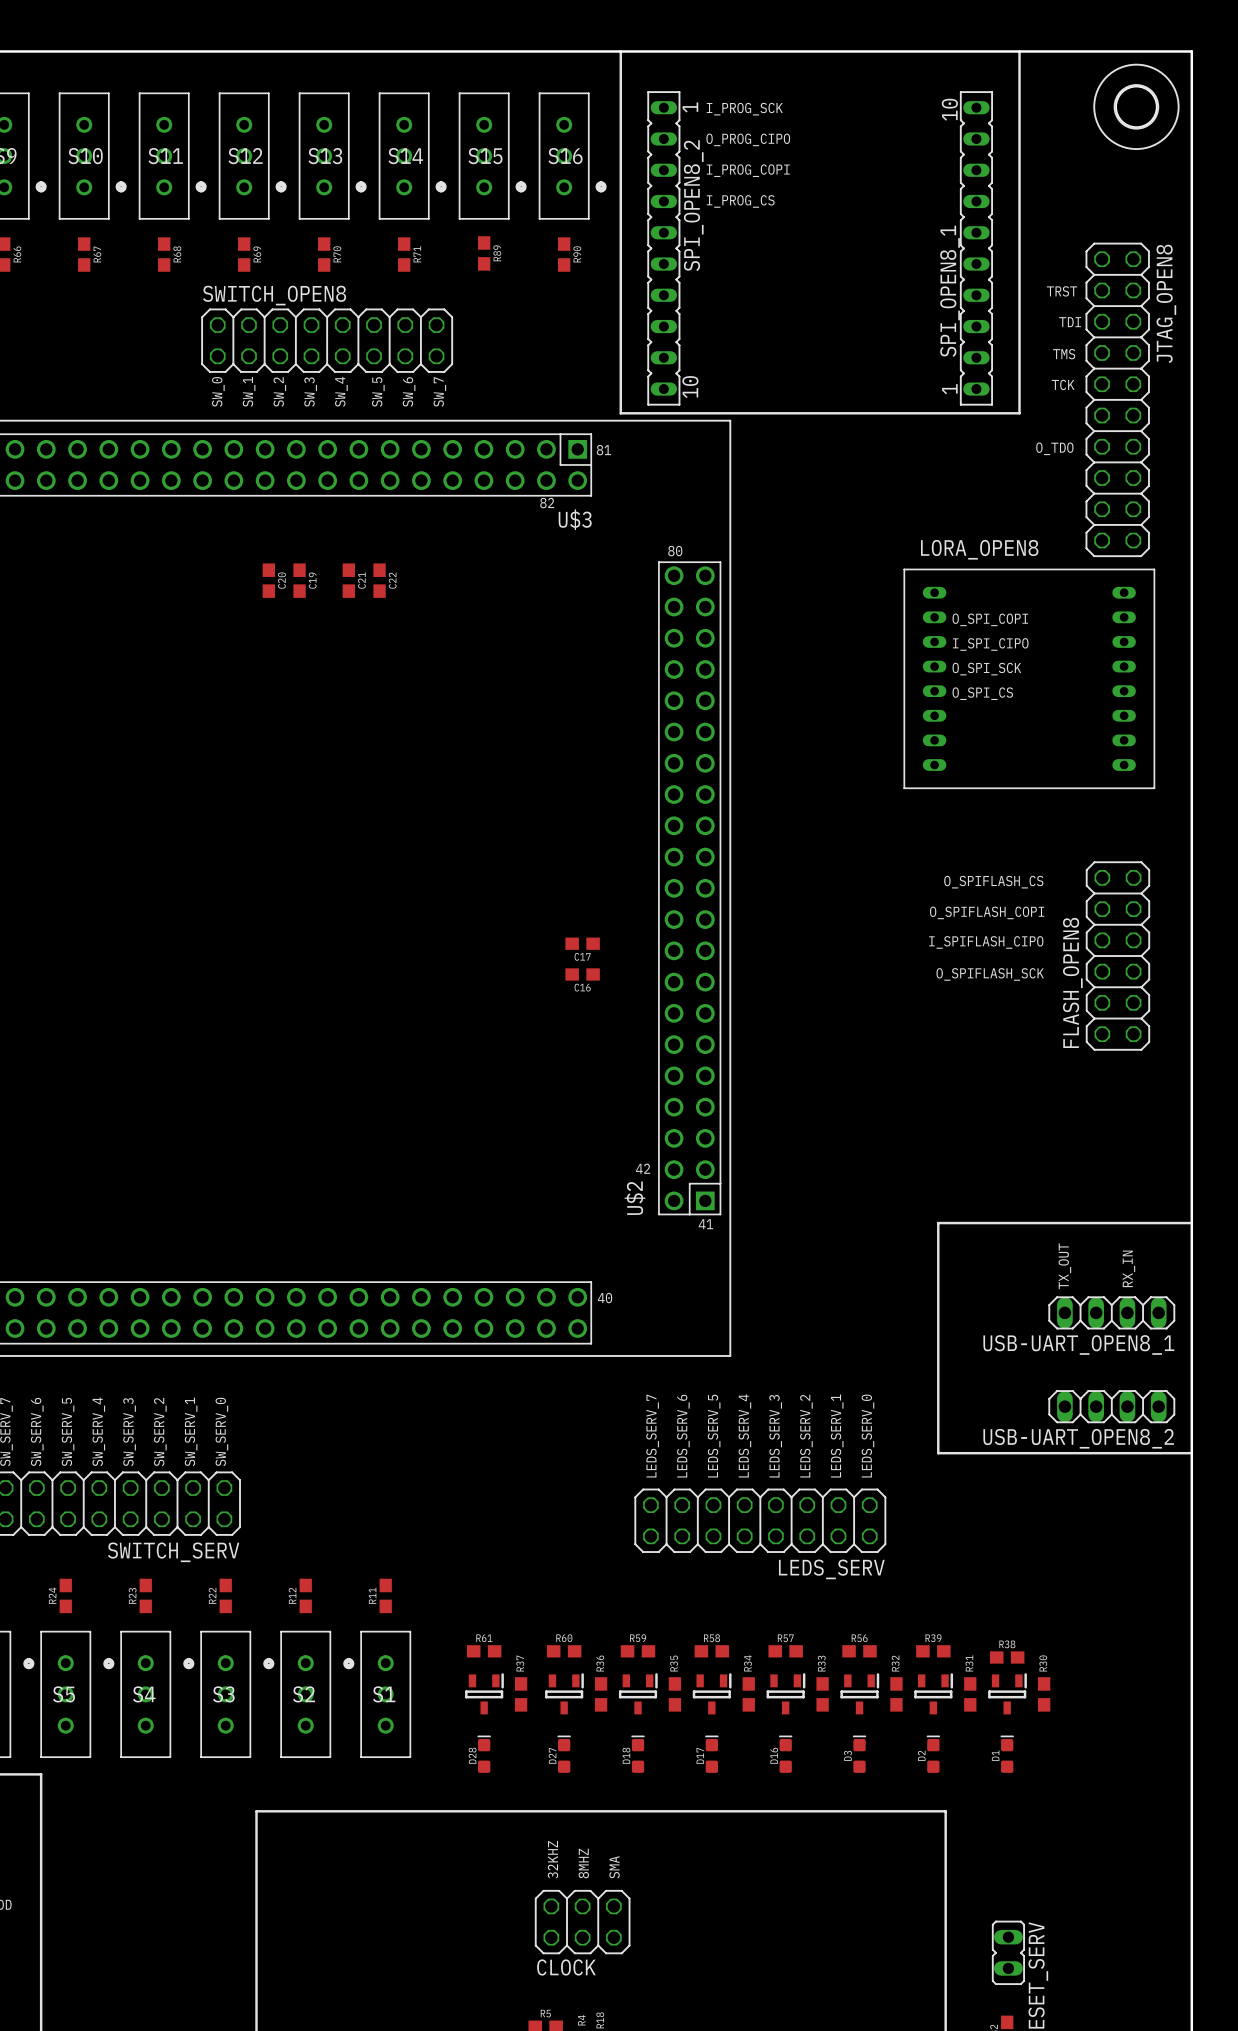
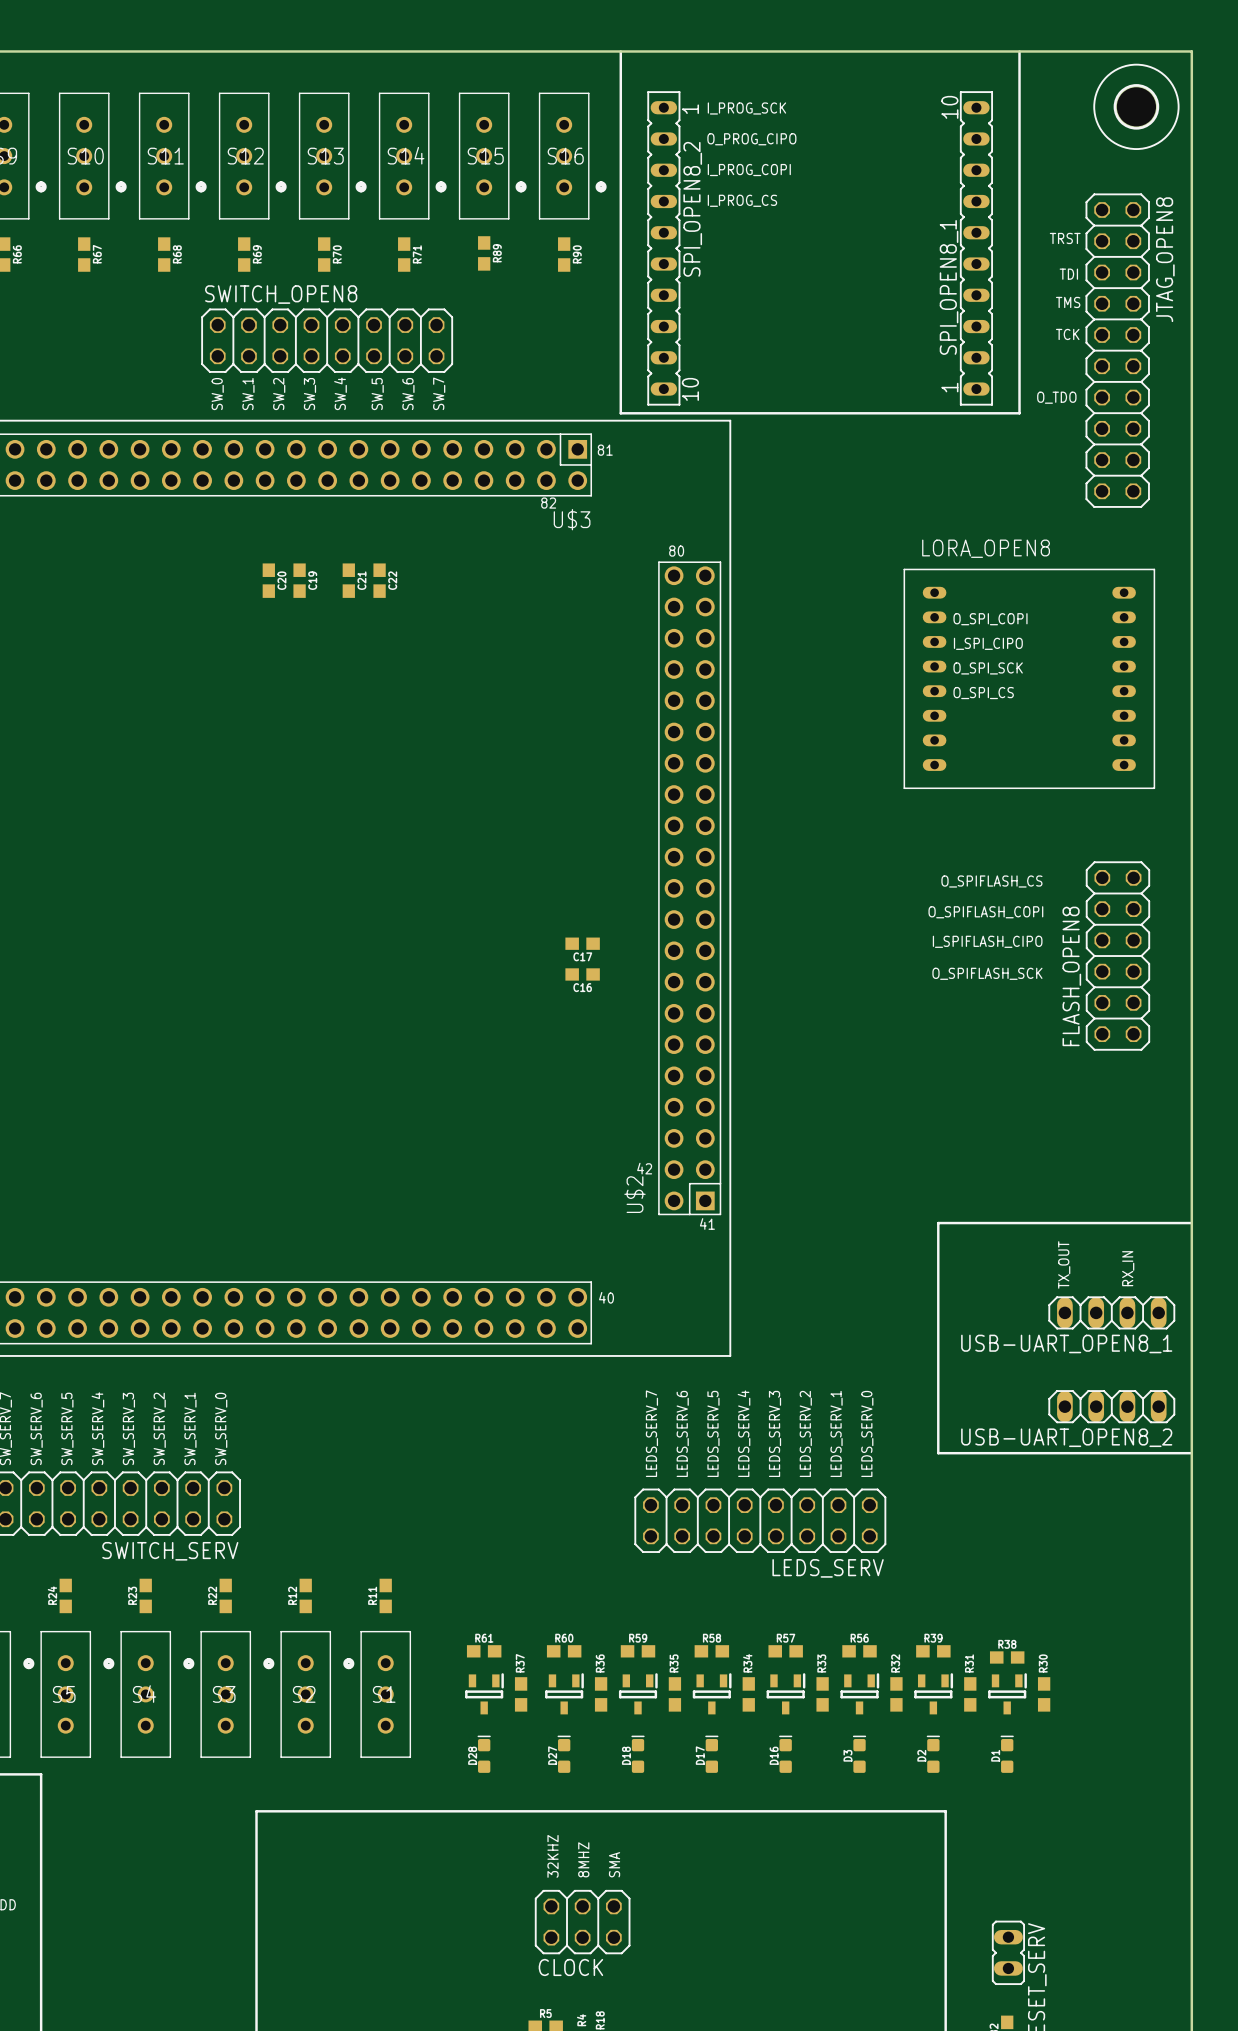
text position: TRST (1062, 291) -> TRST (1065, 238)
text position: TDI (1070, 322) -> TDI (1068, 274)
text position: TMS (1064, 354) -> TMS (1068, 302)
text position: TCK (1063, 384) -> TCK (1067, 334)
JTAG_OPEN8 position: (1117, 399) -> (1117, 350)
text position: O_TDO (1054, 448) -> O_TDO (1056, 397)

